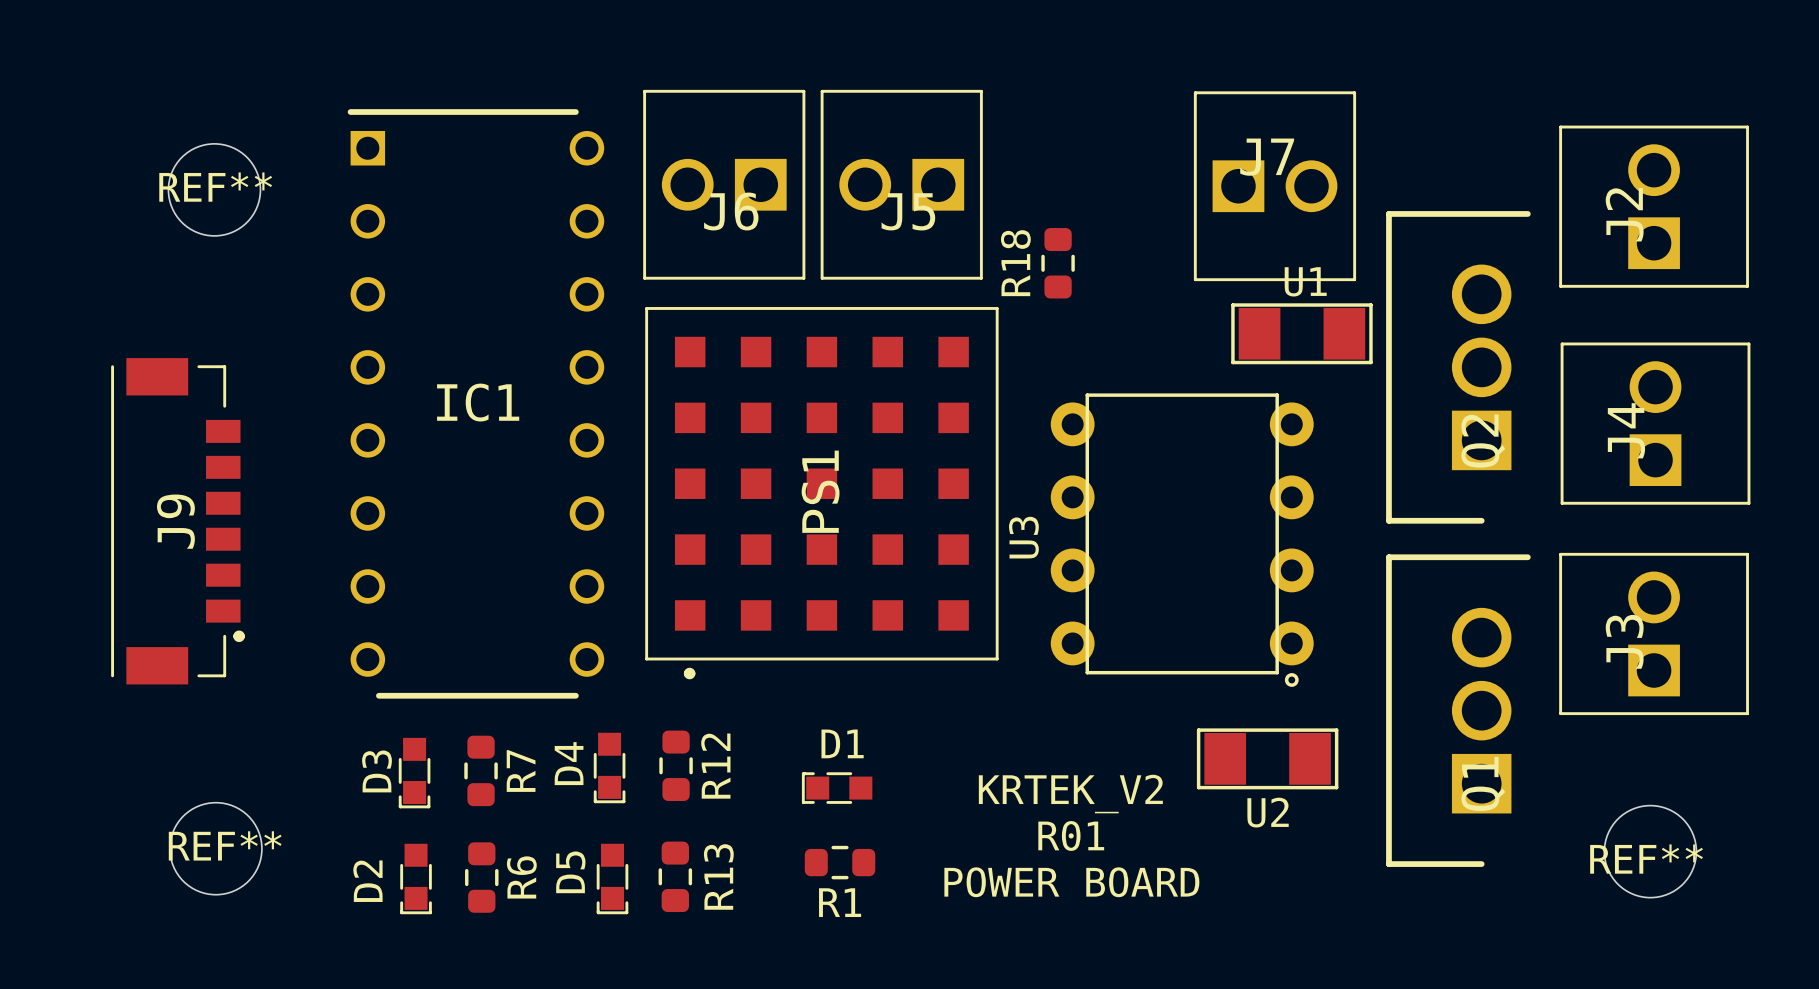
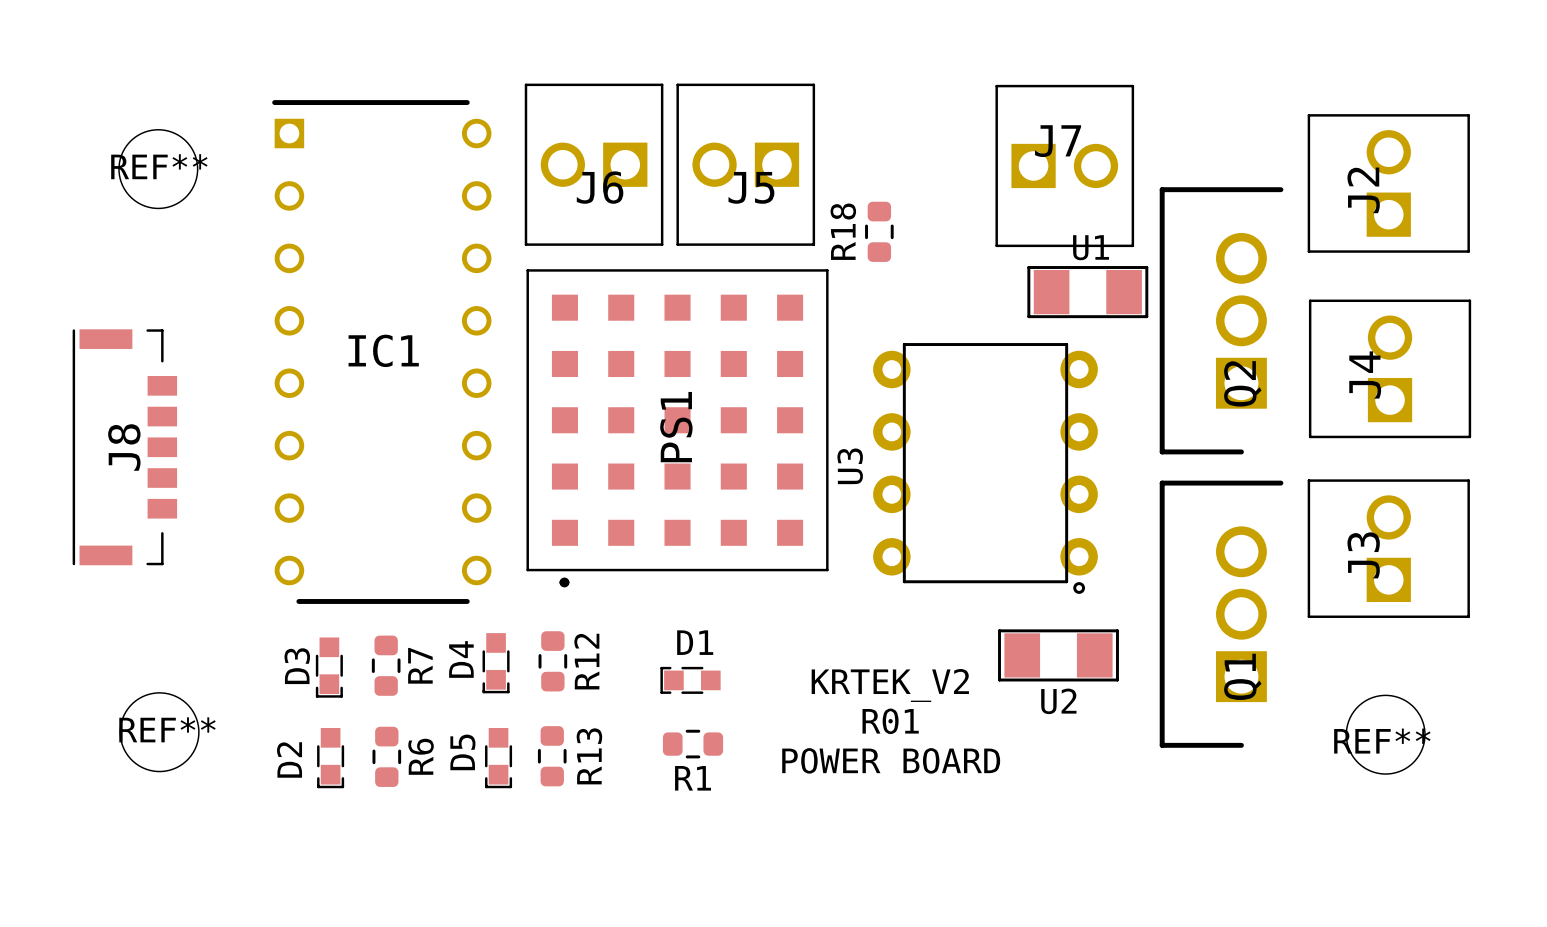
J8: none -> (124, 447)
J9: (177, 521) -> none

